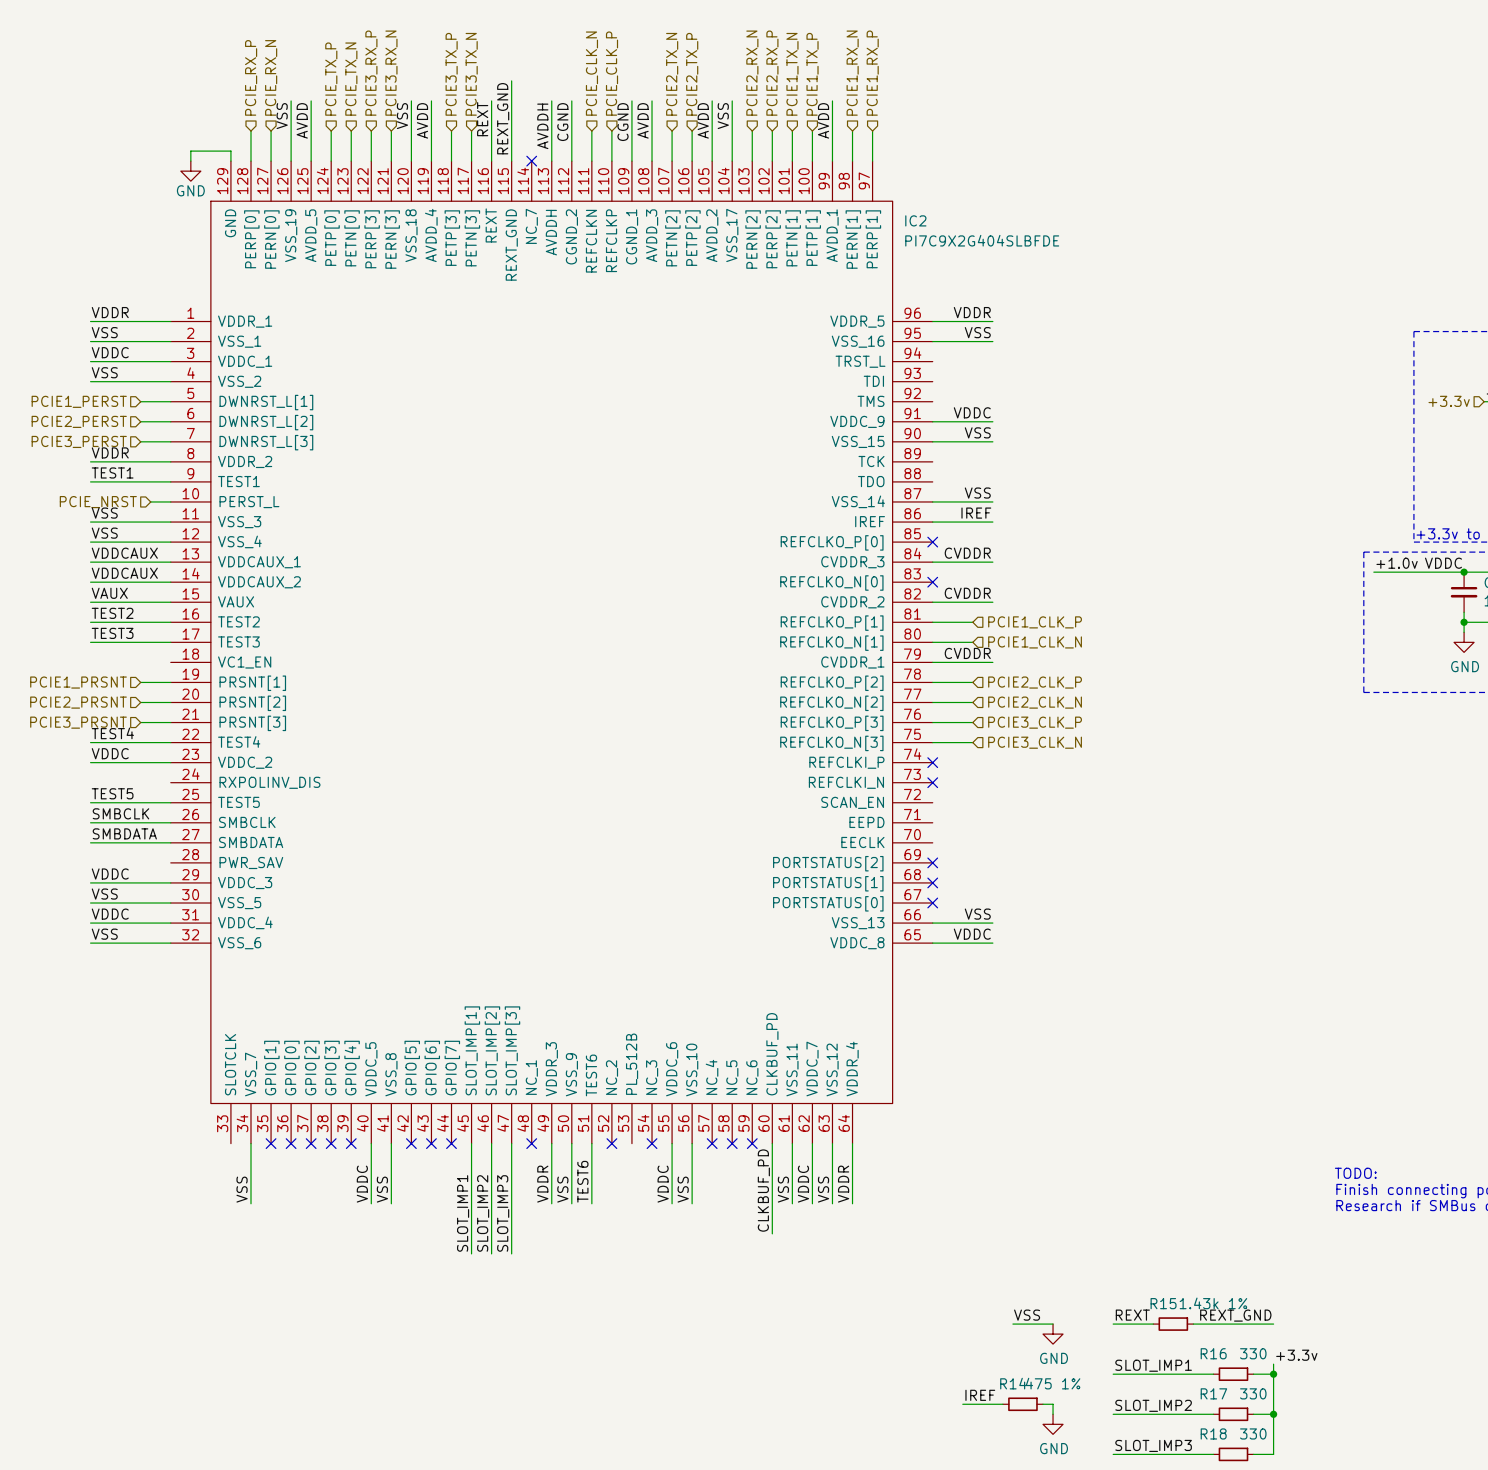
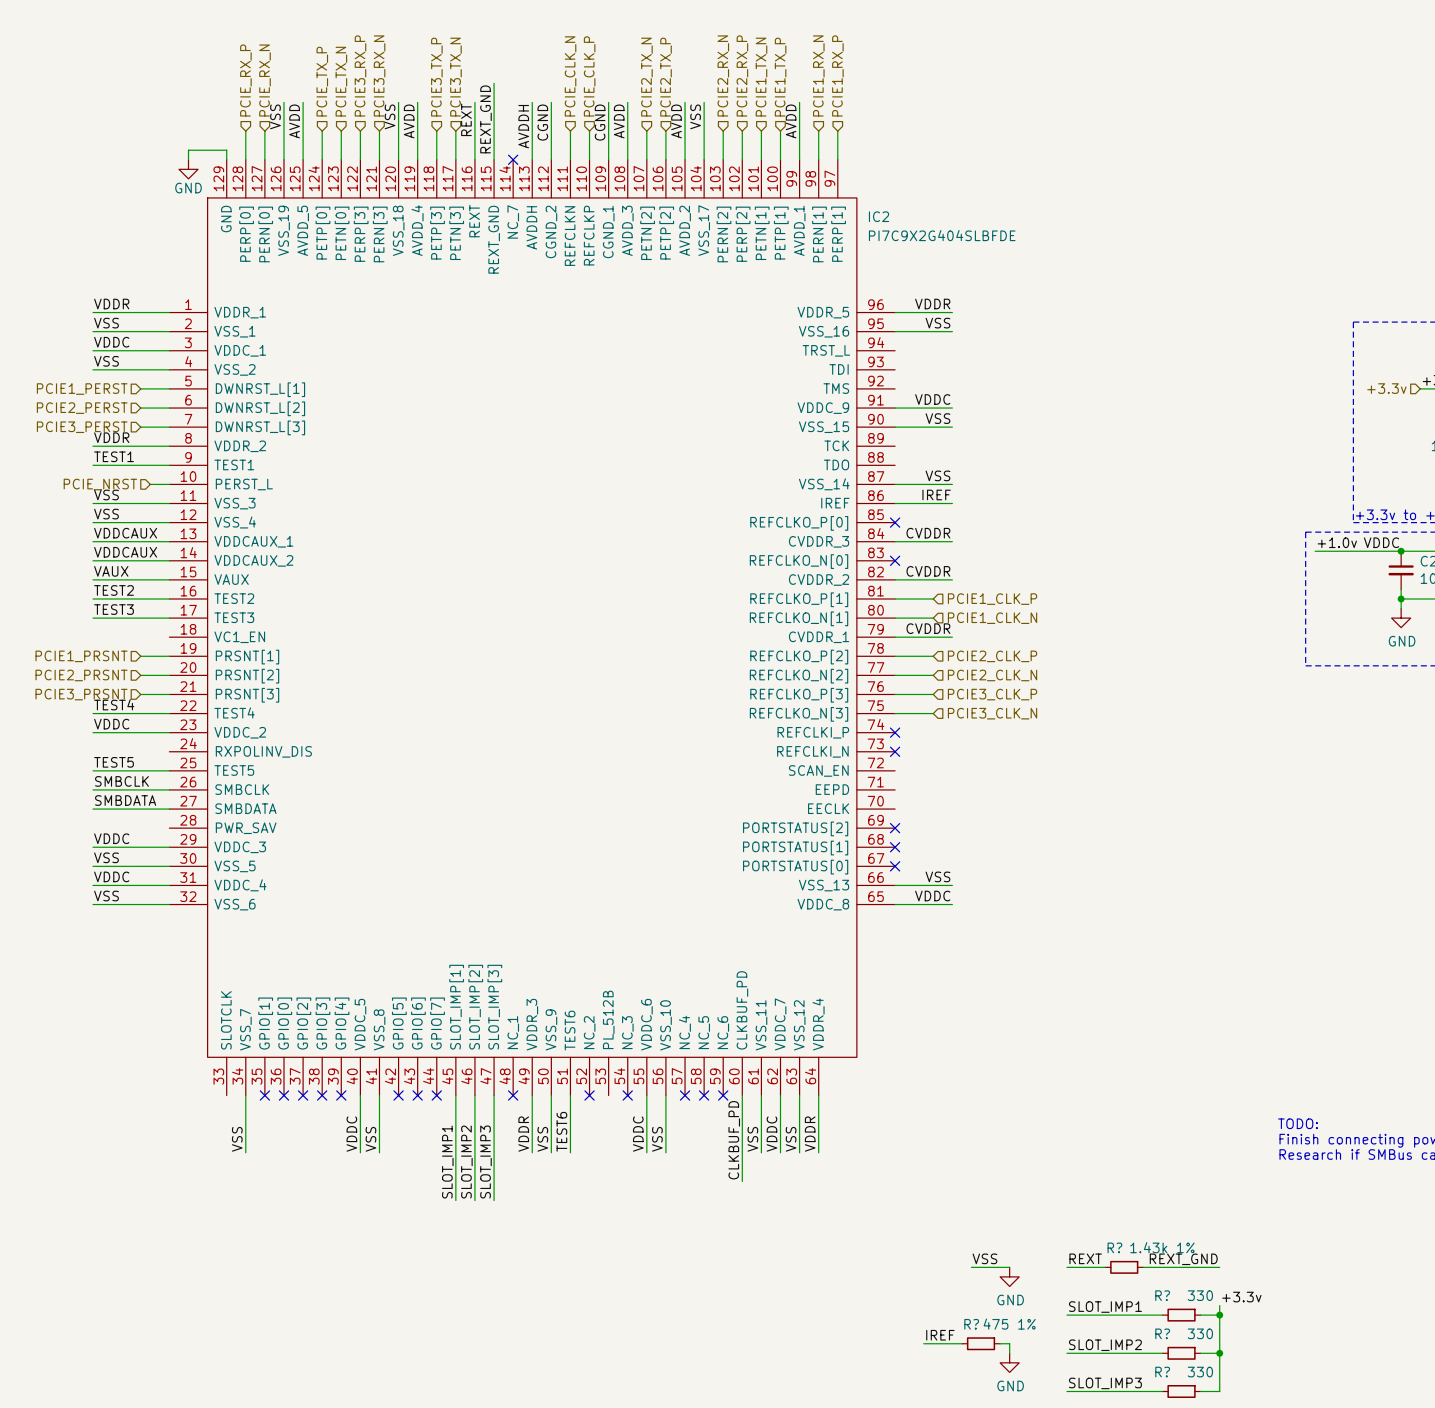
R15 name: R15 (1163, 1303) -> R? (1114, 1247)
R16 name: R16 (1213, 1353) -> R? (1162, 1295)
R14 name: R14 (1013, 1383) -> R? (971, 1324)
R17 name: R17 (1213, 1393) -> R? (1162, 1333)
R18 name: R18 (1213, 1433) -> R? (1162, 1372)

